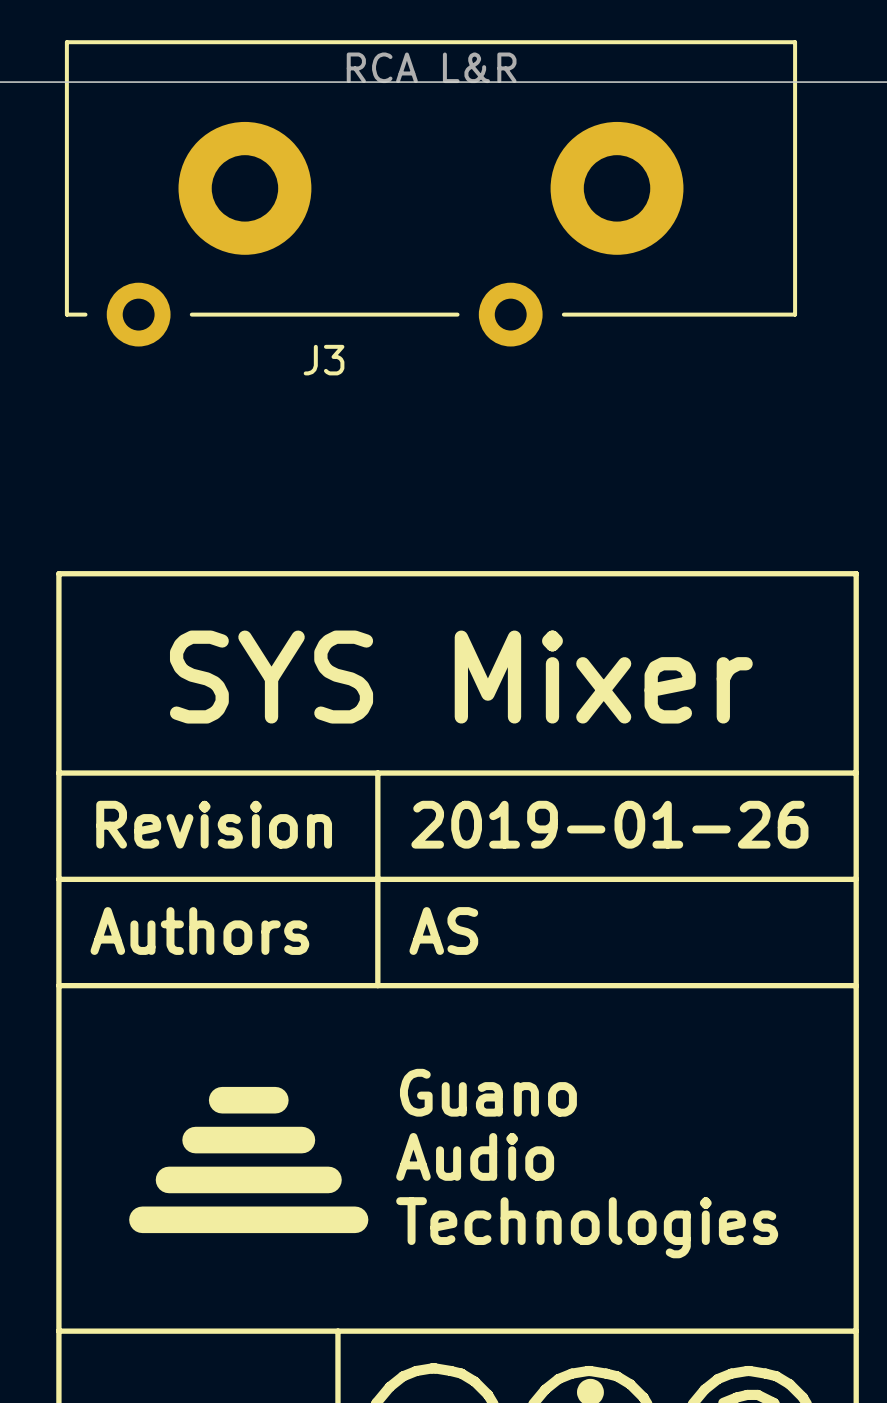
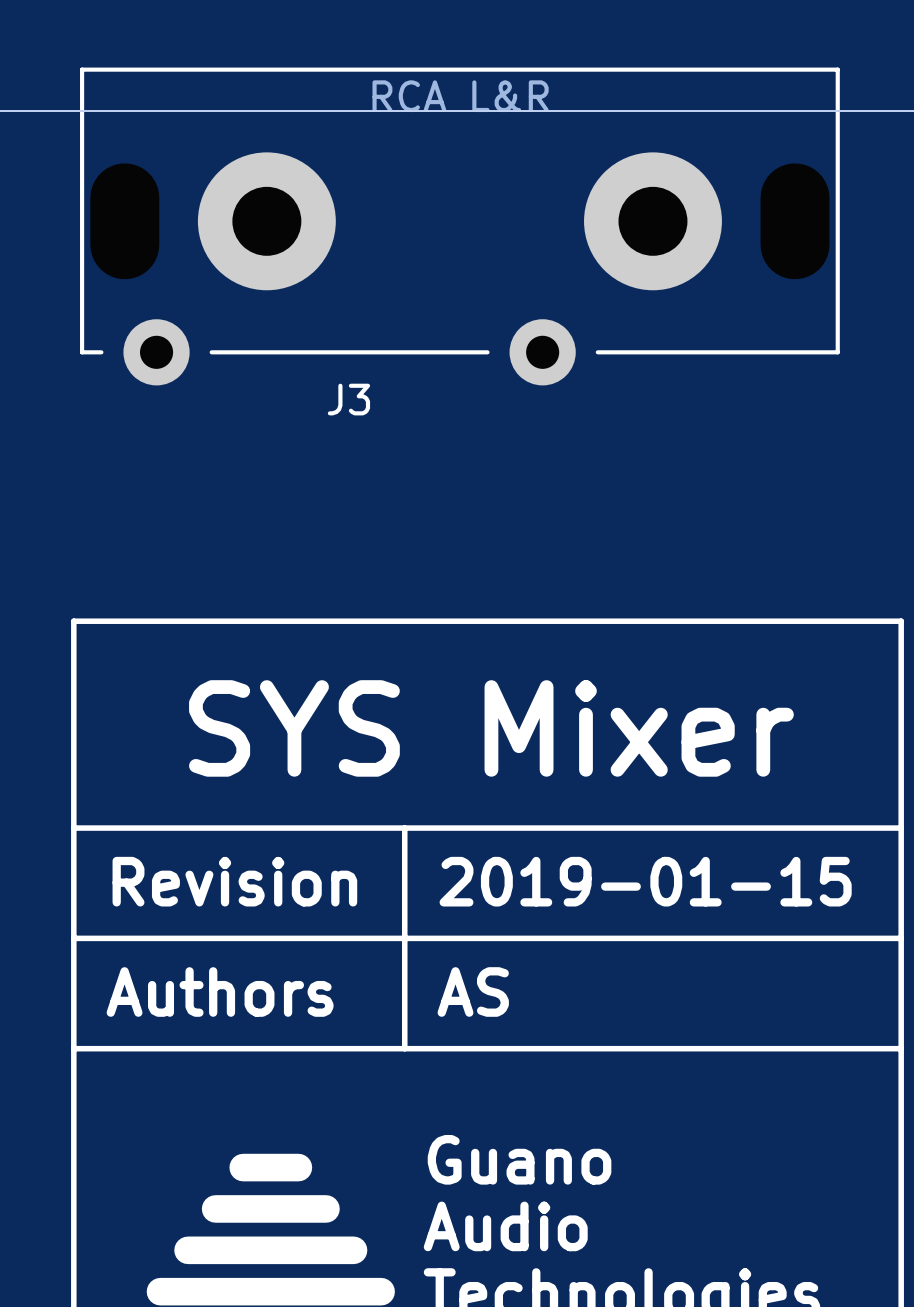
text: 2019-01-26 (609, 824) -> 2019-01-15 (645, 881)

